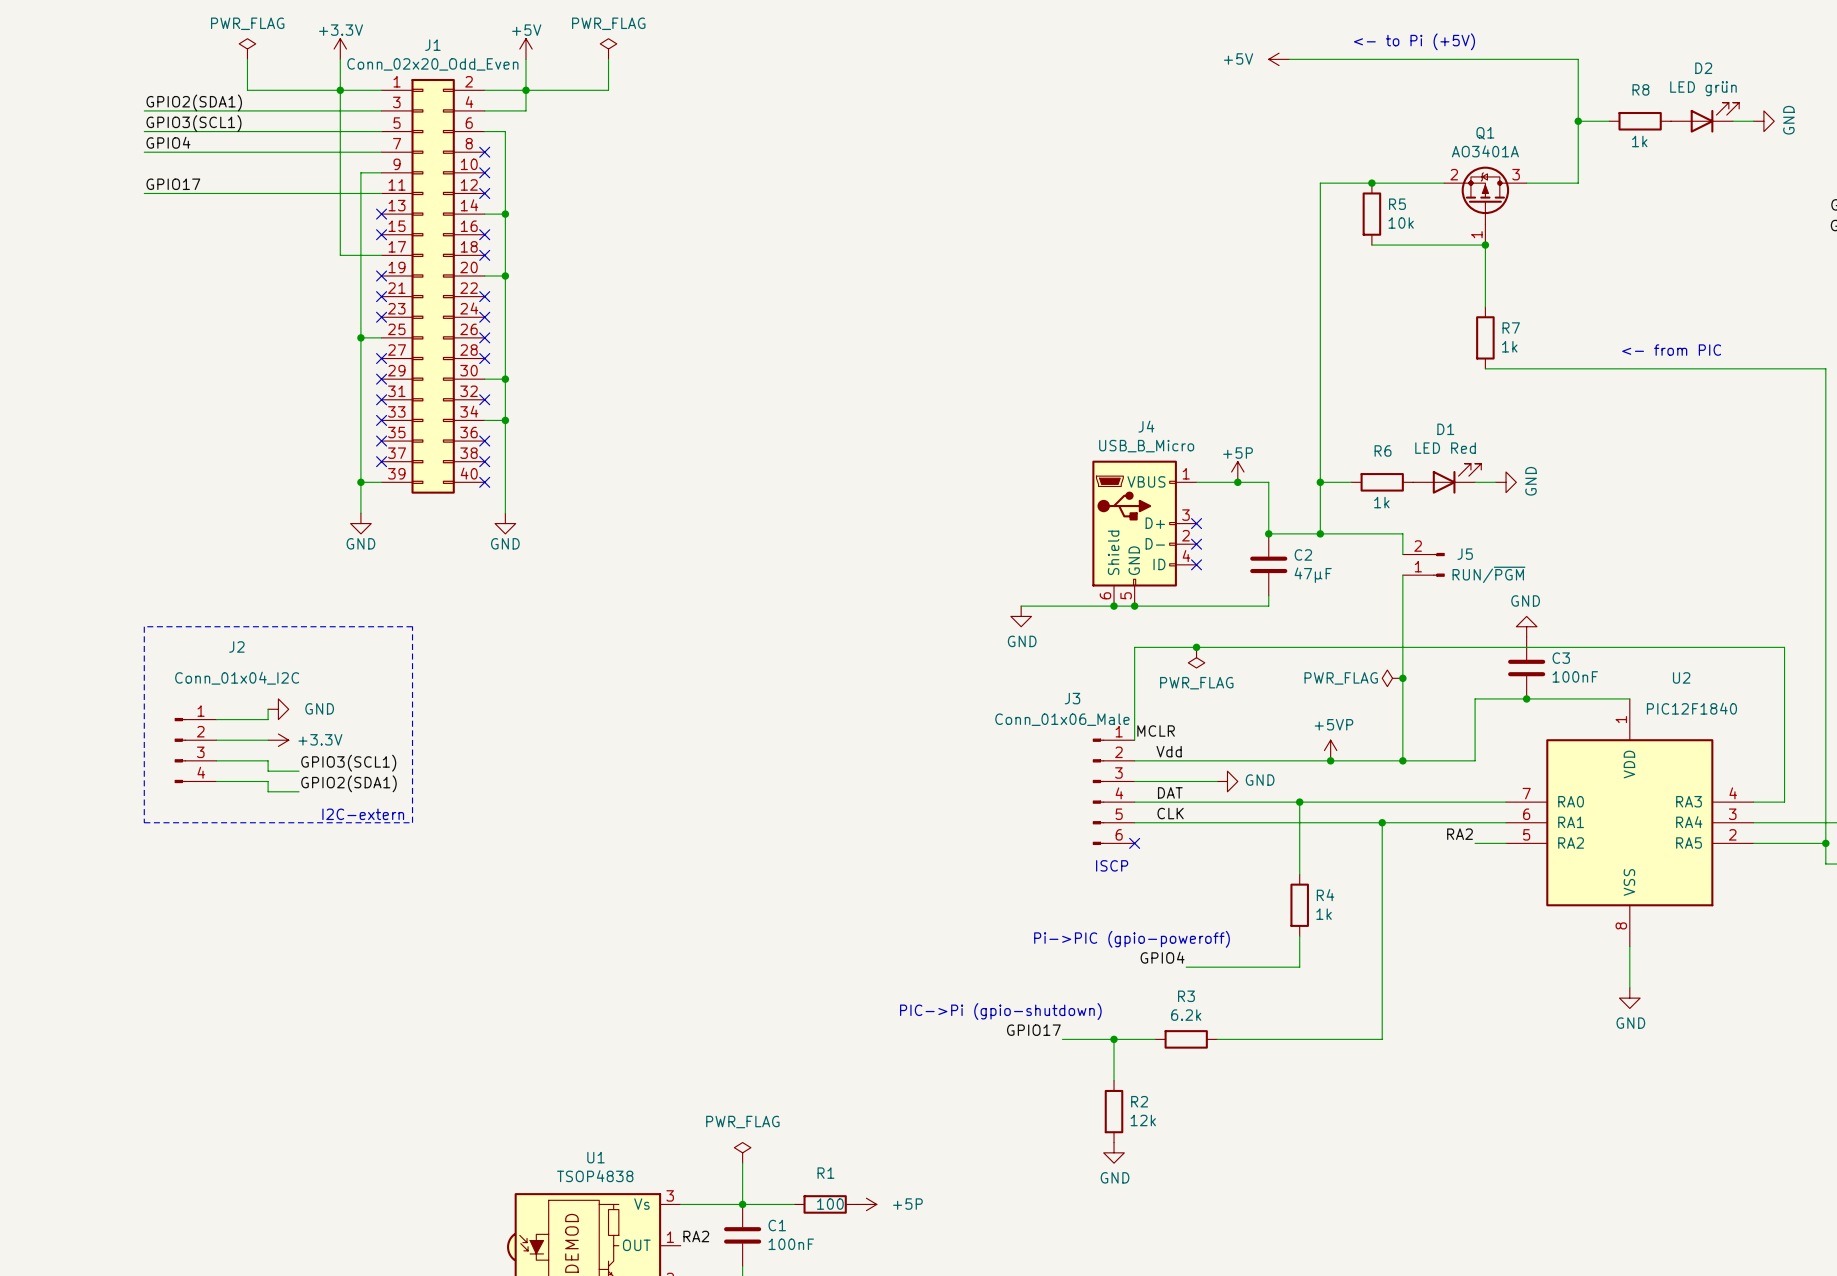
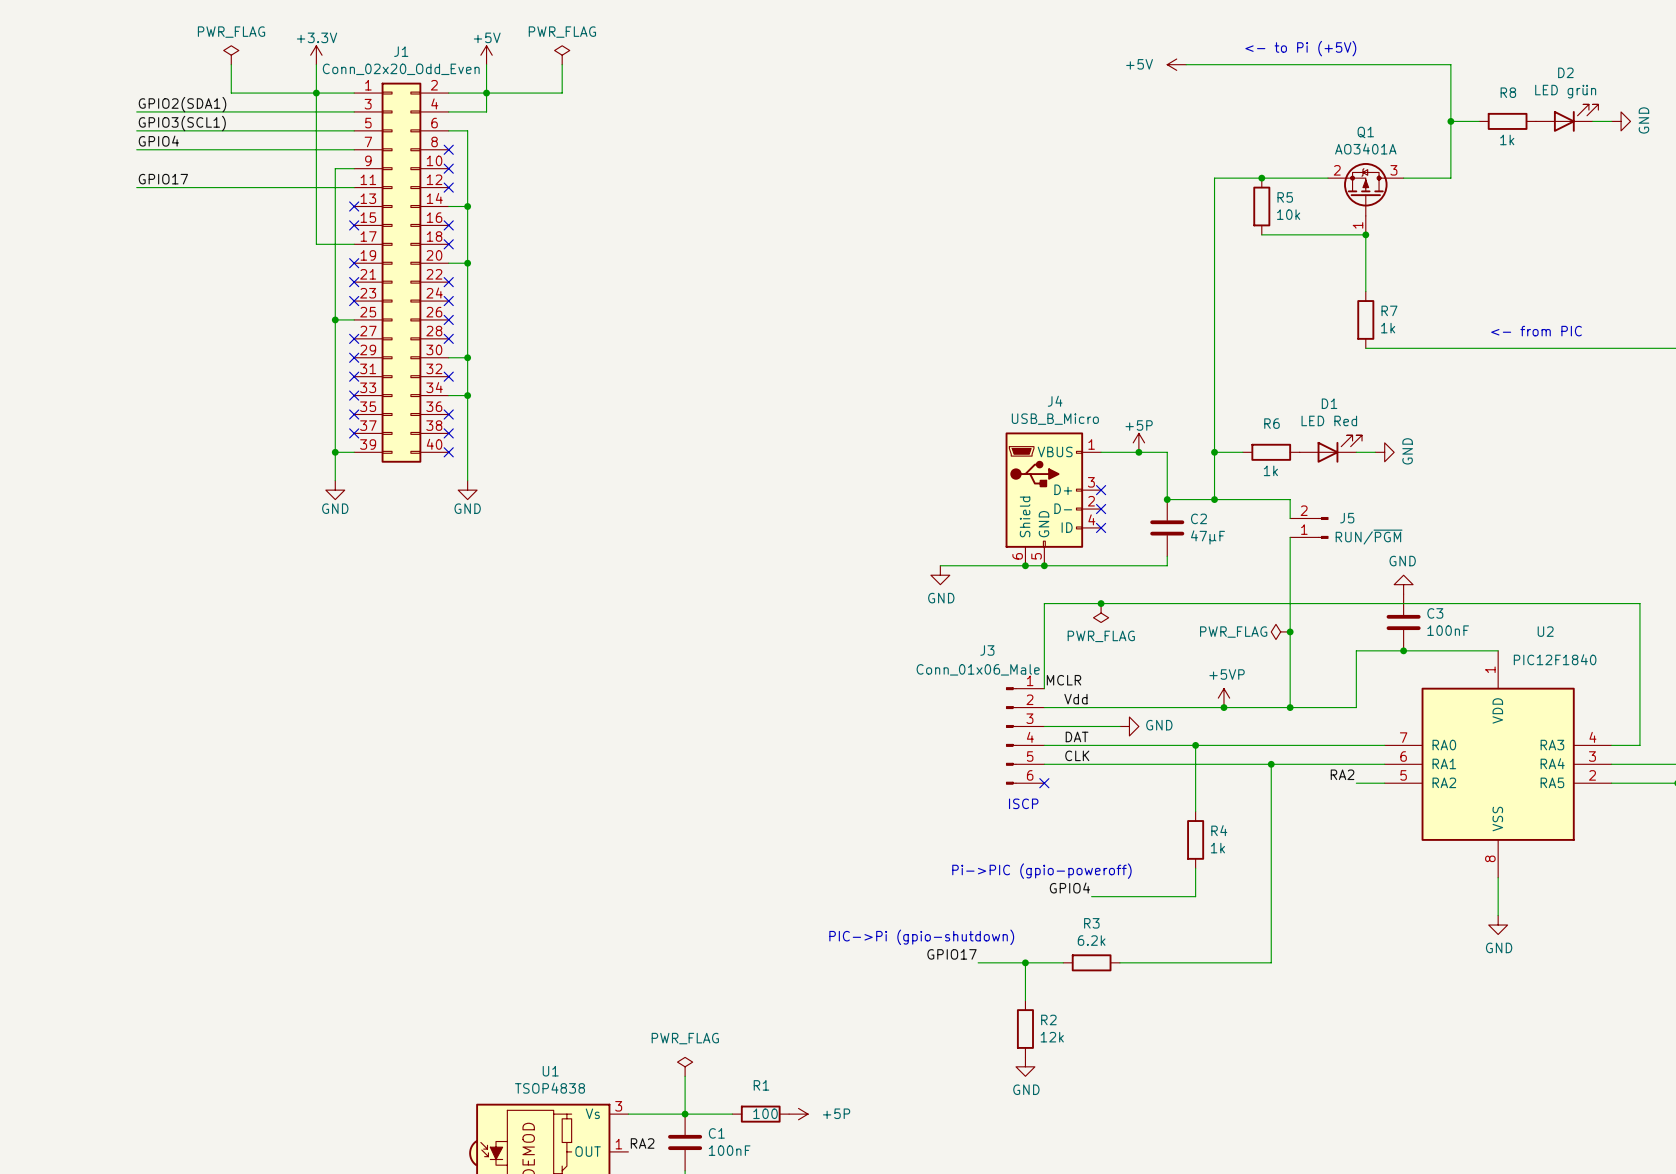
line: (144, 626) (144, 822) (412, 822) (412, 626) (144, 626) -> none
wire: (268, 709) (268, 719) (216, 719) -> none
power symbol: GND (278, 709) -> none
wire: (216, 740) (268, 740) -> none
power symbol: +3.3V (278, 740) -> none
J2: Conn_01x04_I2C (195, 750) -> none
wire: (216, 760) (268, 760) (268, 771) (299, 771) -> none
label: GPIO3(SCL1) (348, 763) -> none
wire: (216, 781) (268, 781) (268, 791) (299, 791) -> none
label: GPIO2(SDA1) (348, 783) -> none
text: I2C-extern (363, 814) -> none

